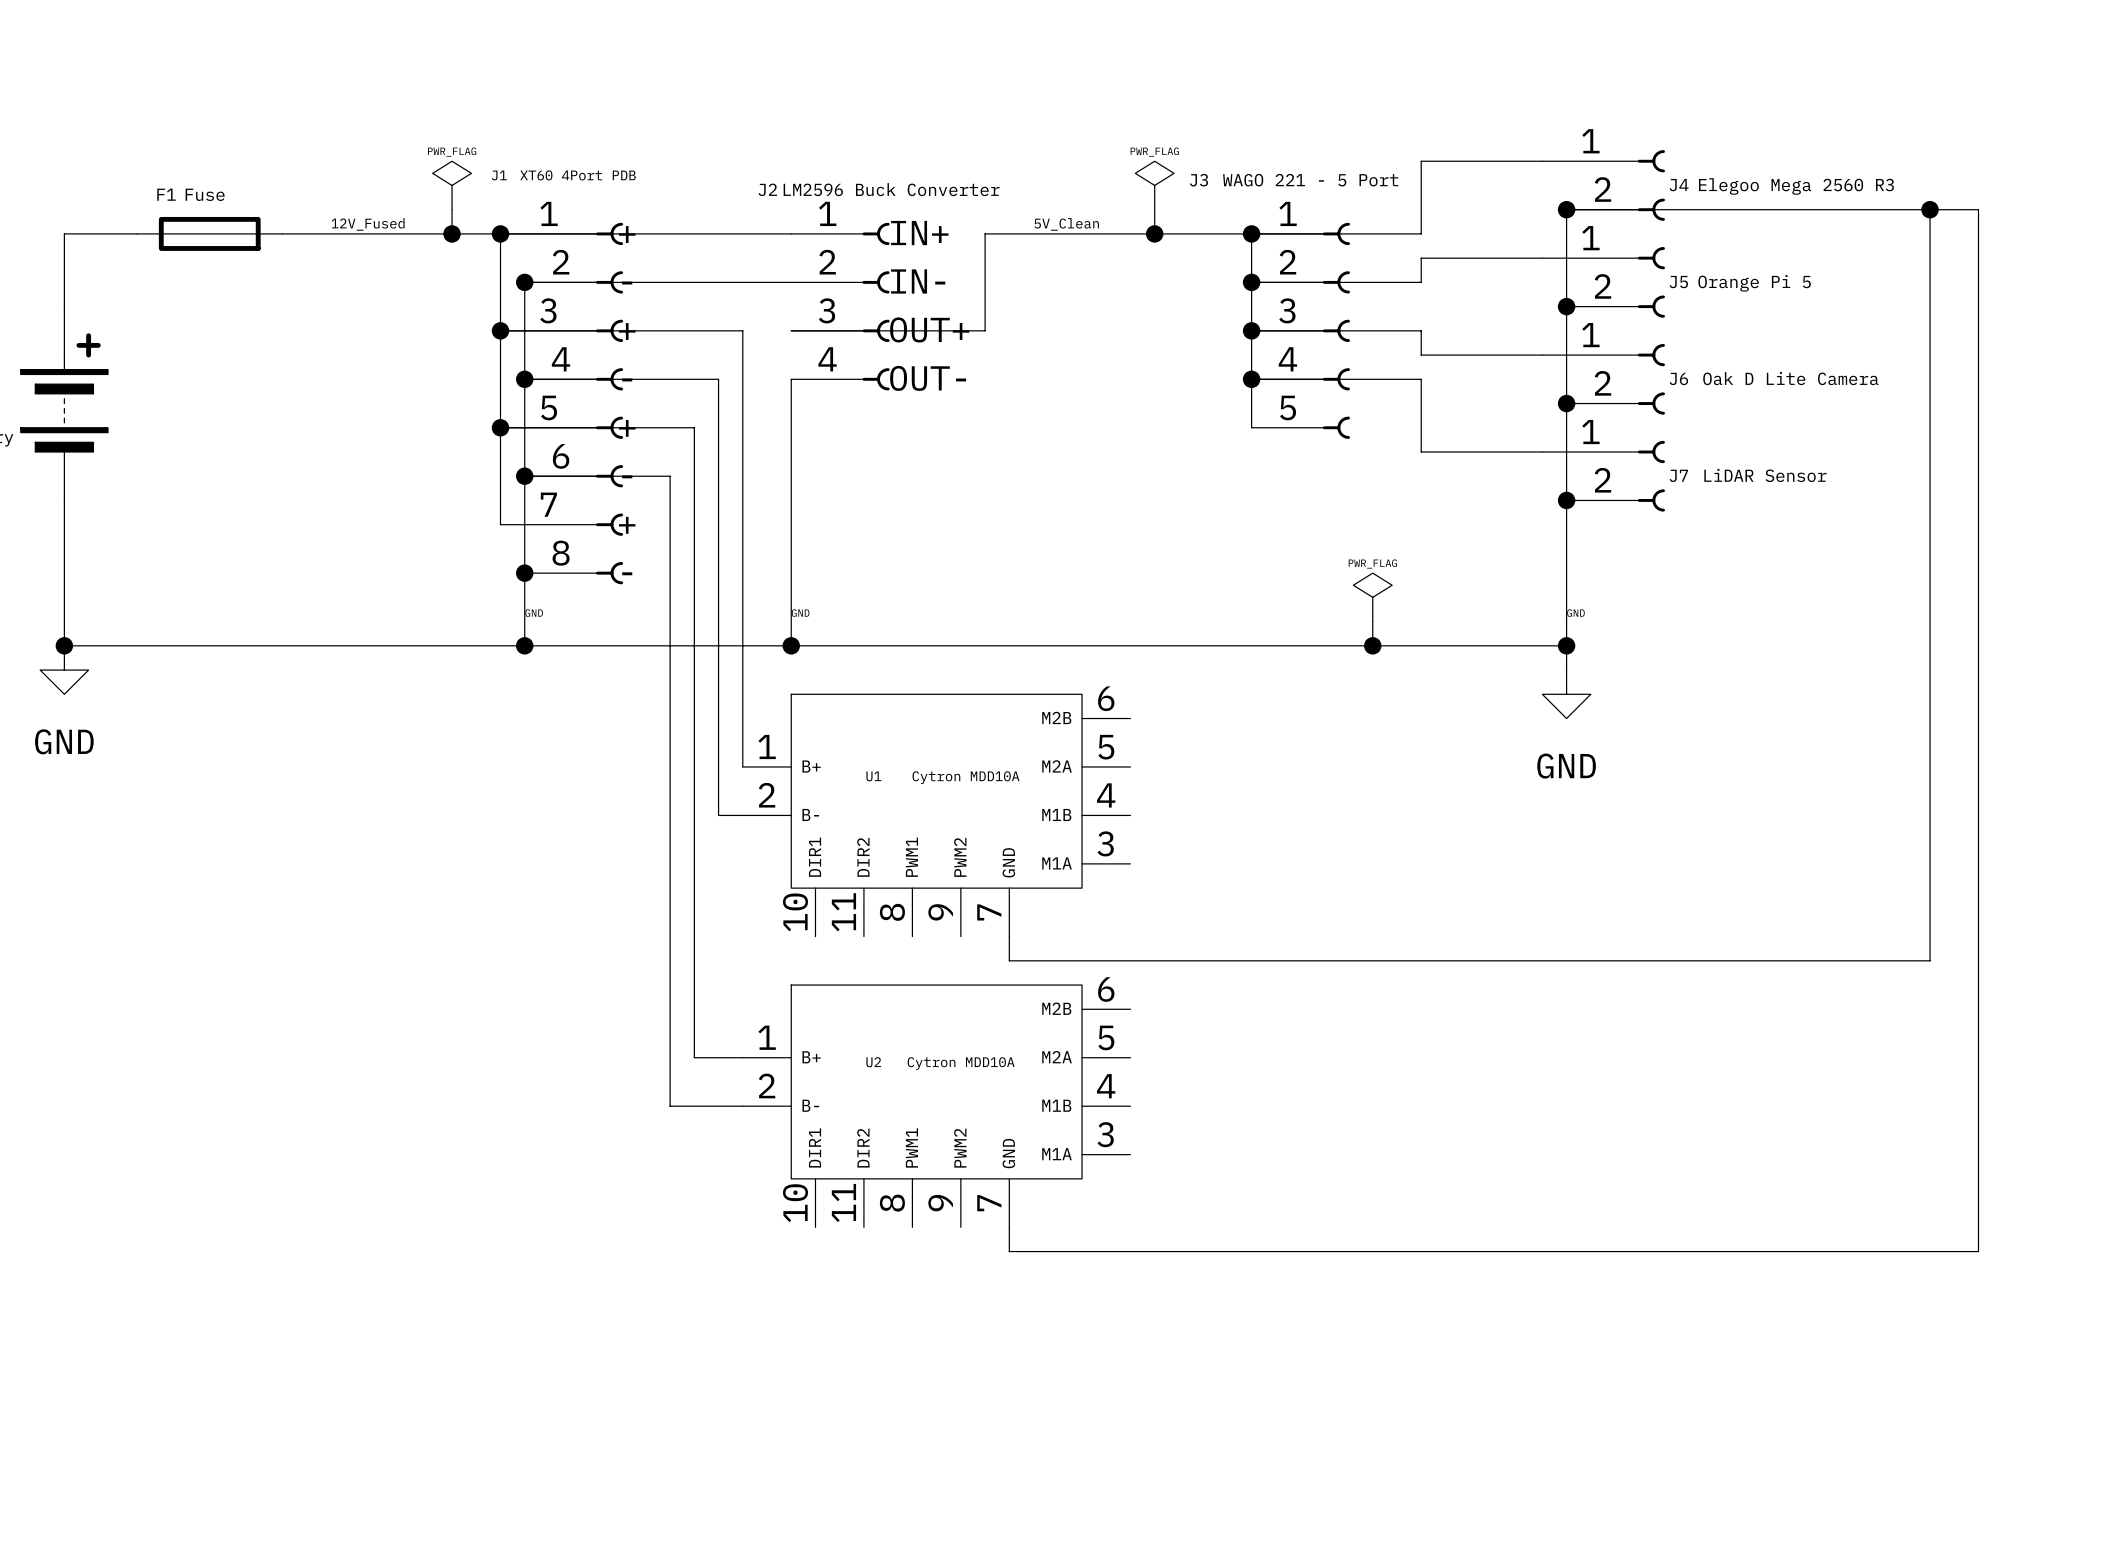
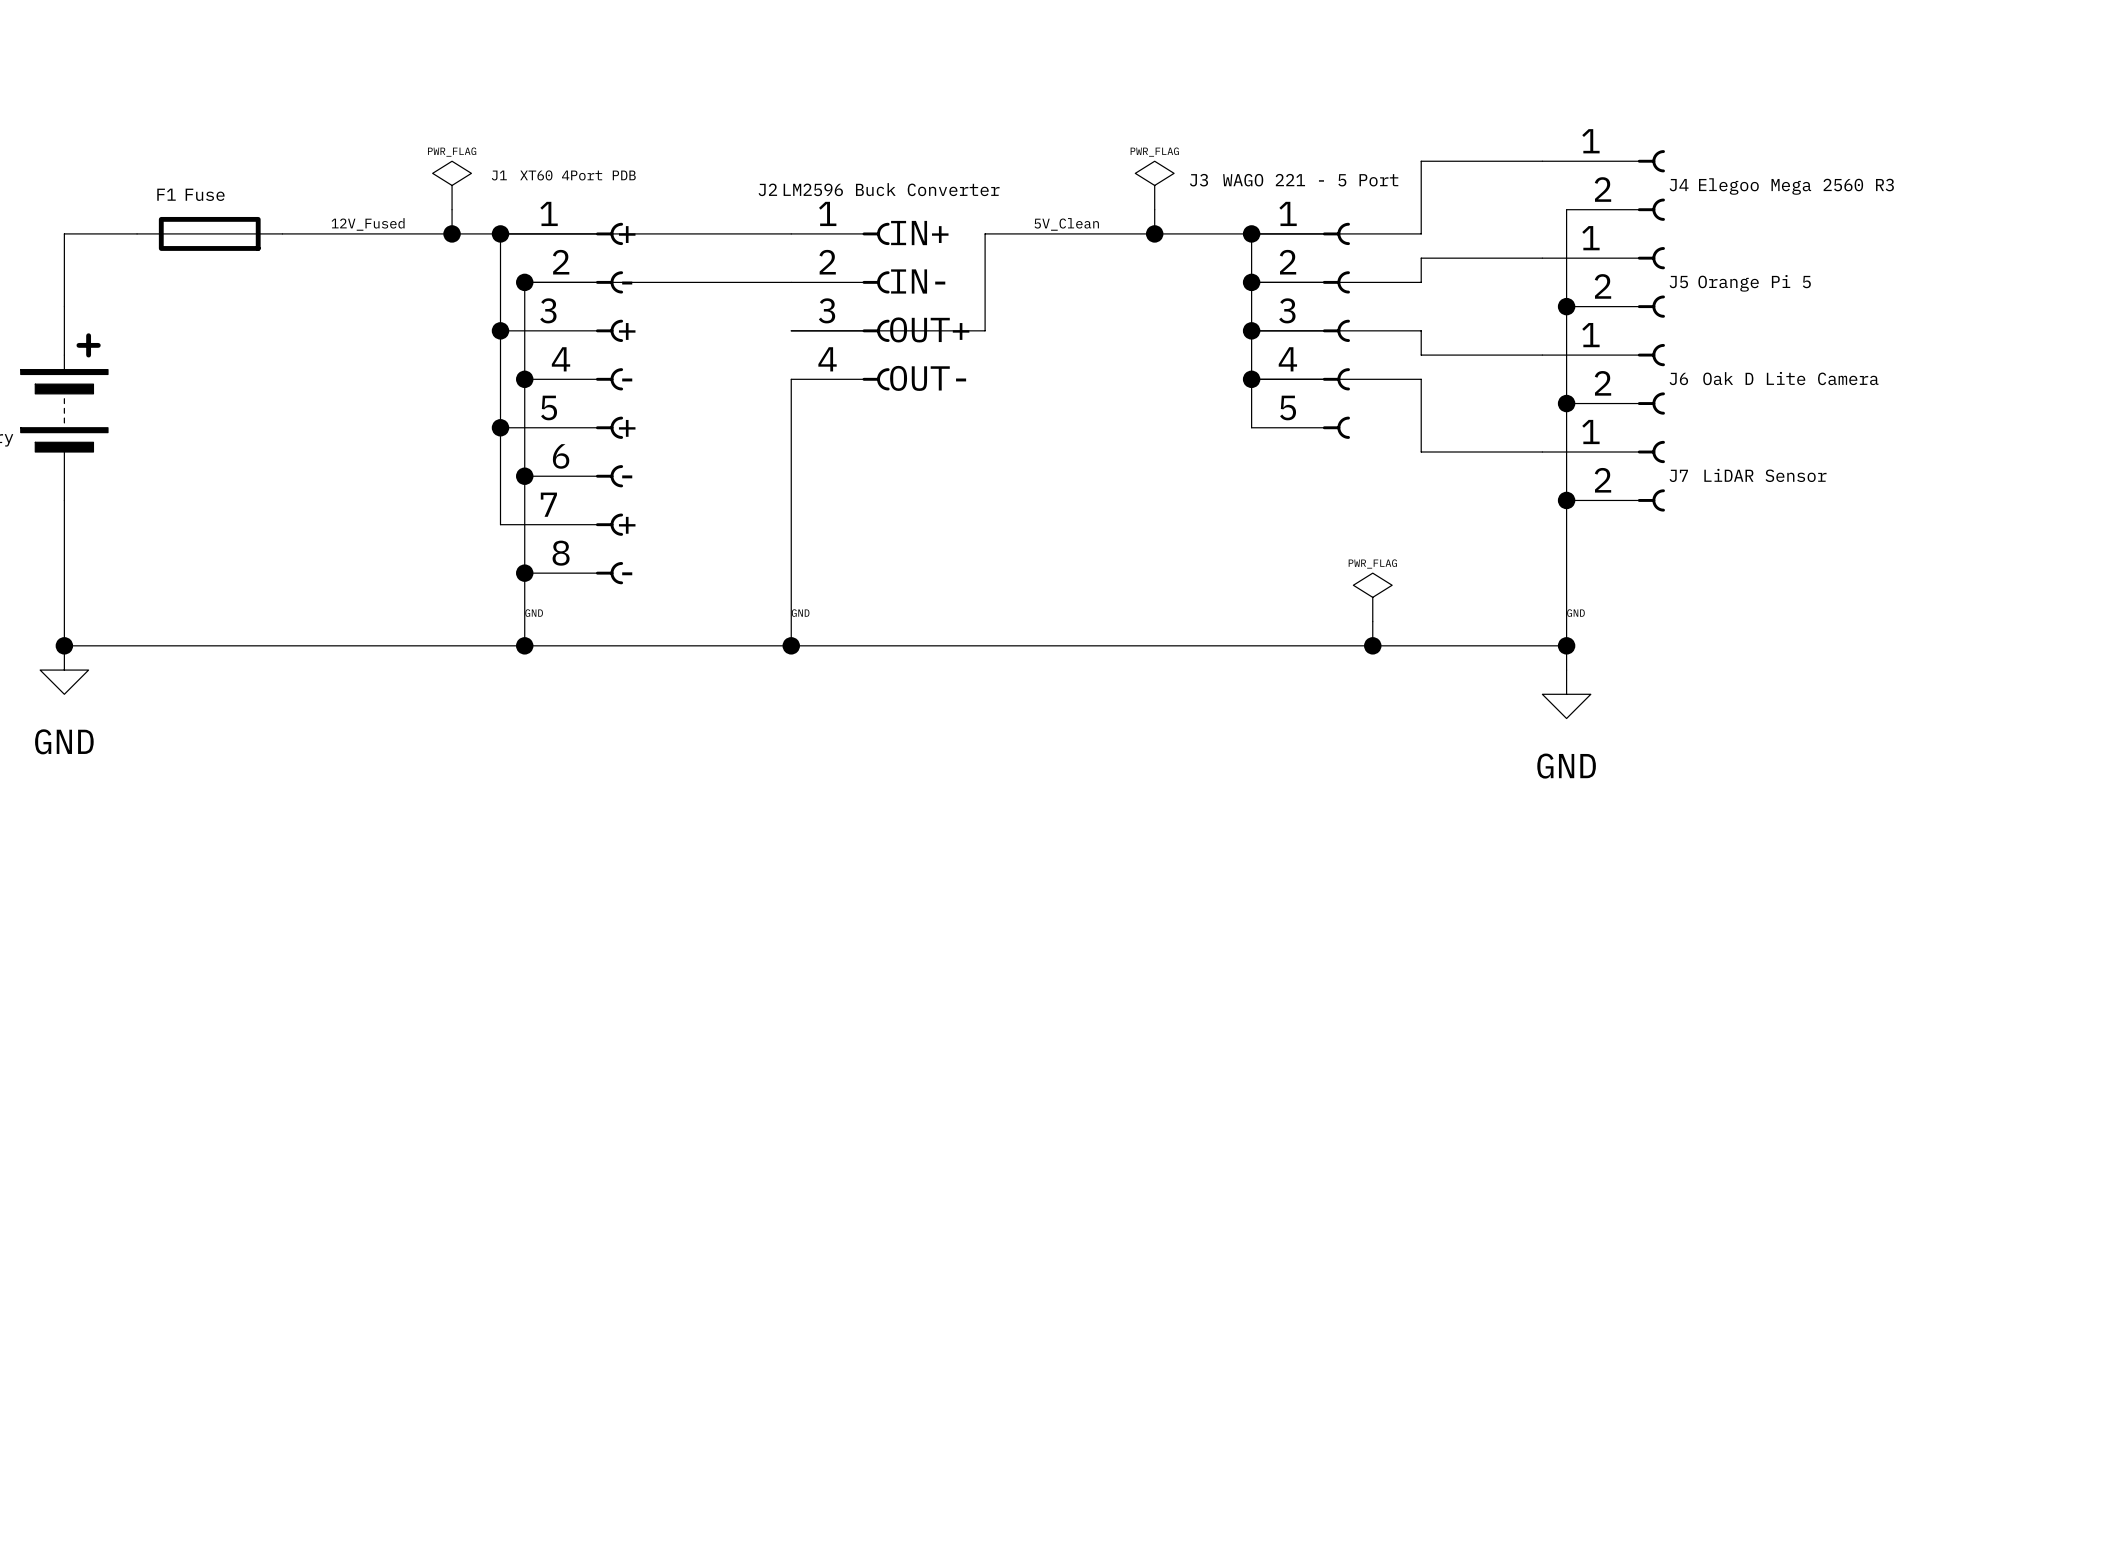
wire: (1566, 209) (1978, 209) (1978, 1251) (1009, 1251) (1009, 1227) -> none
junction: (1566, 209) -> none
wire: (1930, 209) (1930, 960) (1009, 960) (1009, 936) -> none
junction: (1930, 209) -> none
wire: (500, 330) (742, 330) (742, 766) -> none
wire: (524, 379) (718, 379) (718, 815) (742, 815) -> none
wire: (500, 427) (694, 427) (694, 1057) (742, 1057) -> none
wire: (524, 476) (670, 476) (670, 1106) (742, 1106) -> none
U1: Cytron MDD10A (936, 815) -> none
U2: Cytron MDD10A (936, 1106) -> none

